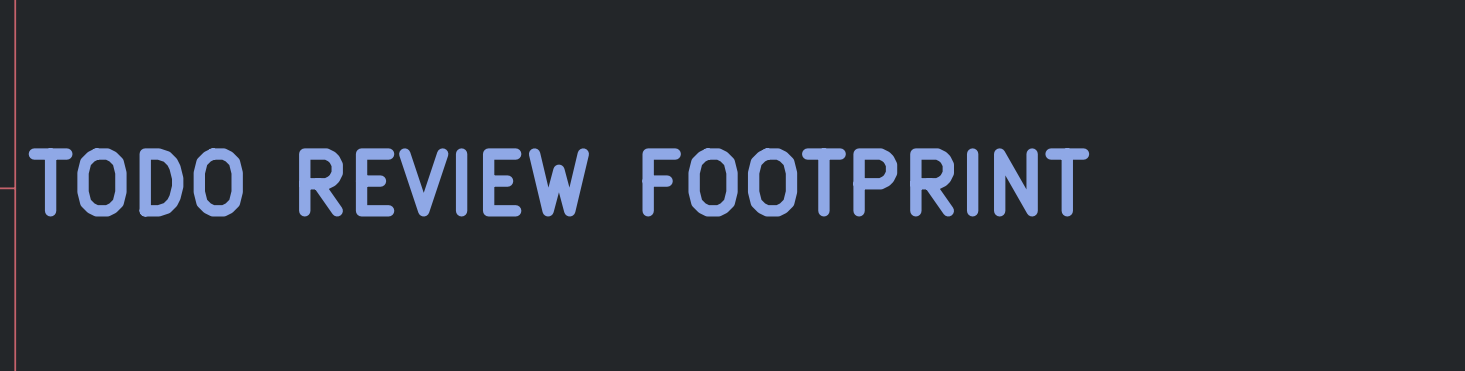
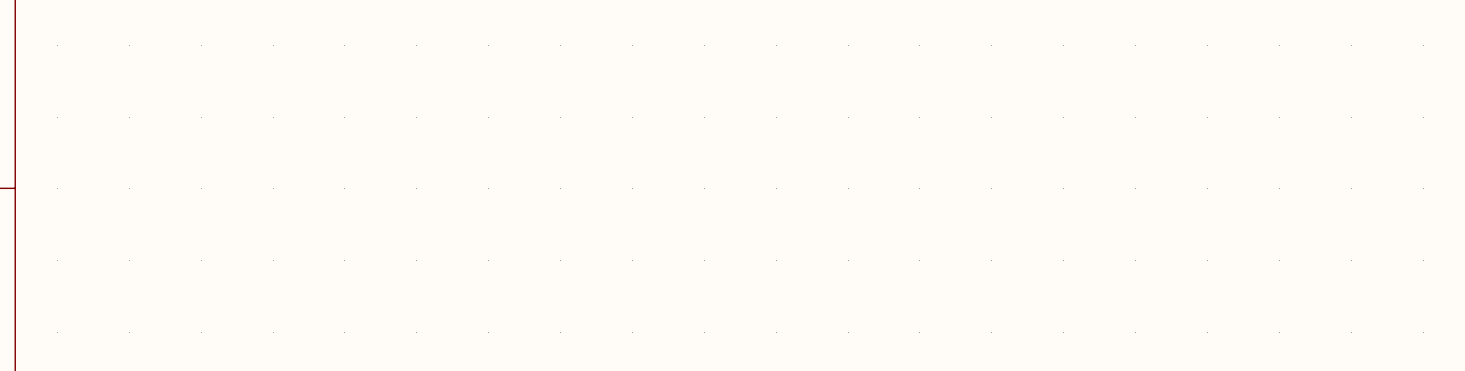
text: TODO REVIEW FOOTPRINT (558, 182) -> none

